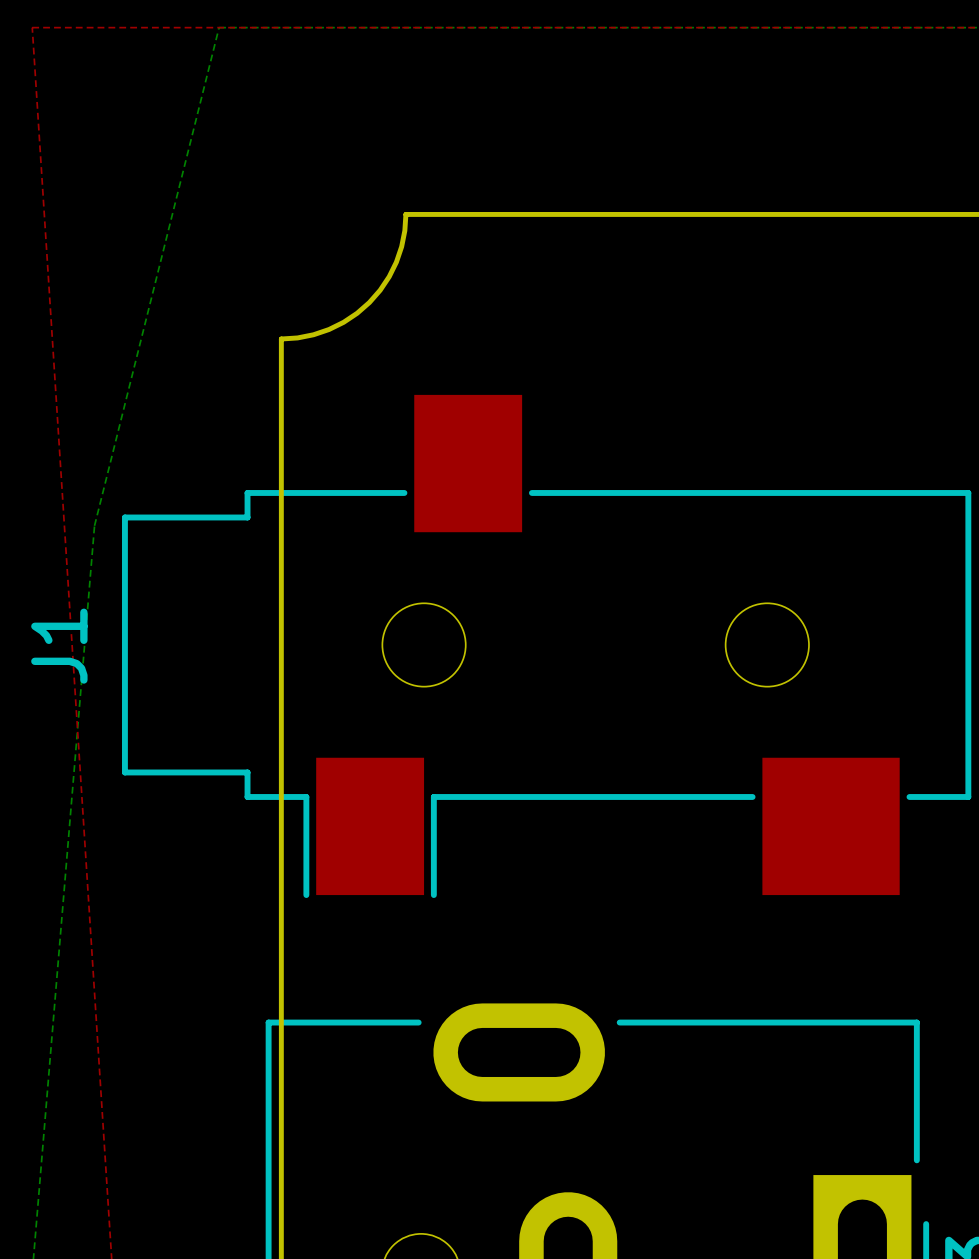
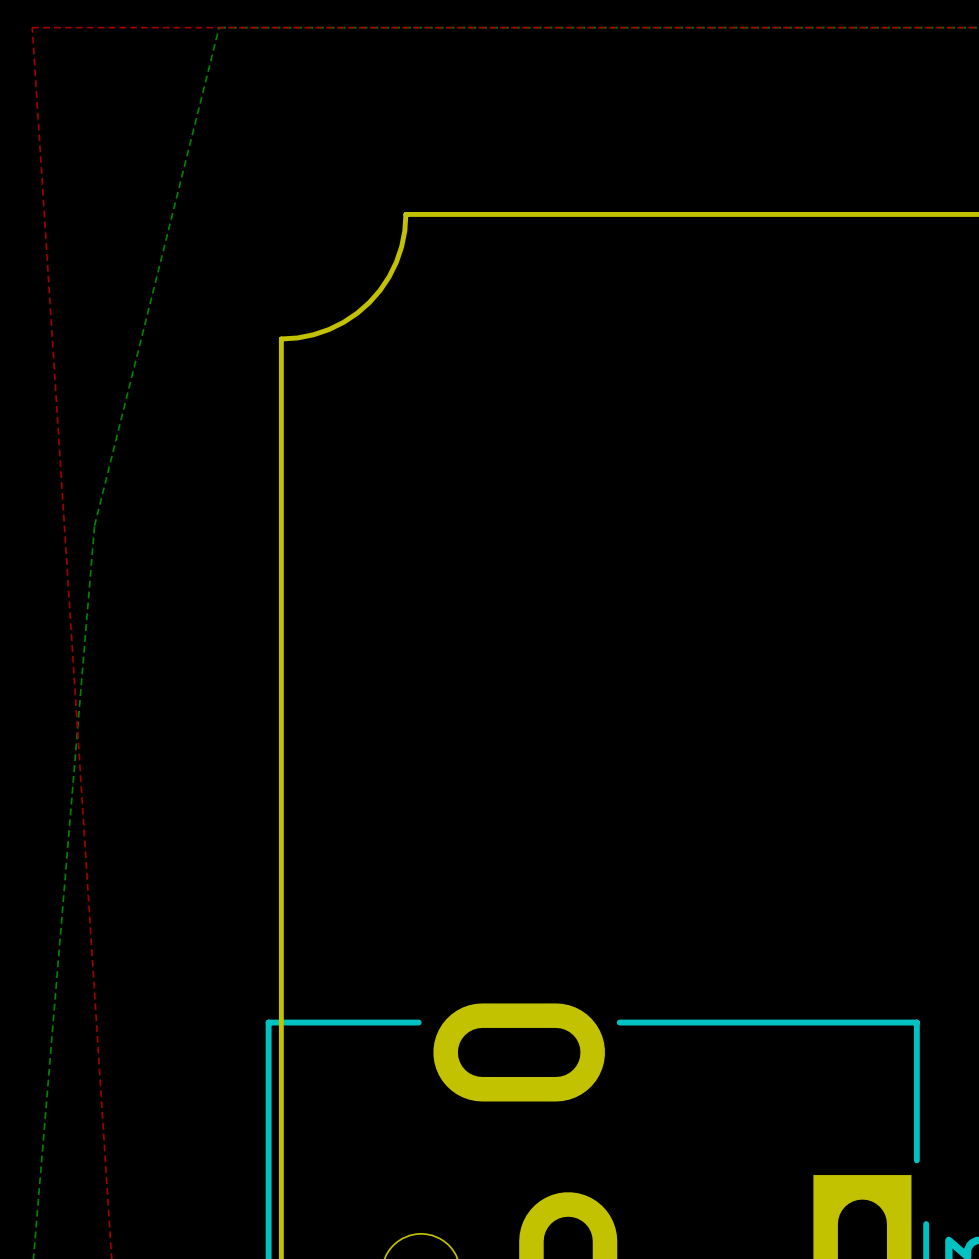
J1: (546, 646) -> none

